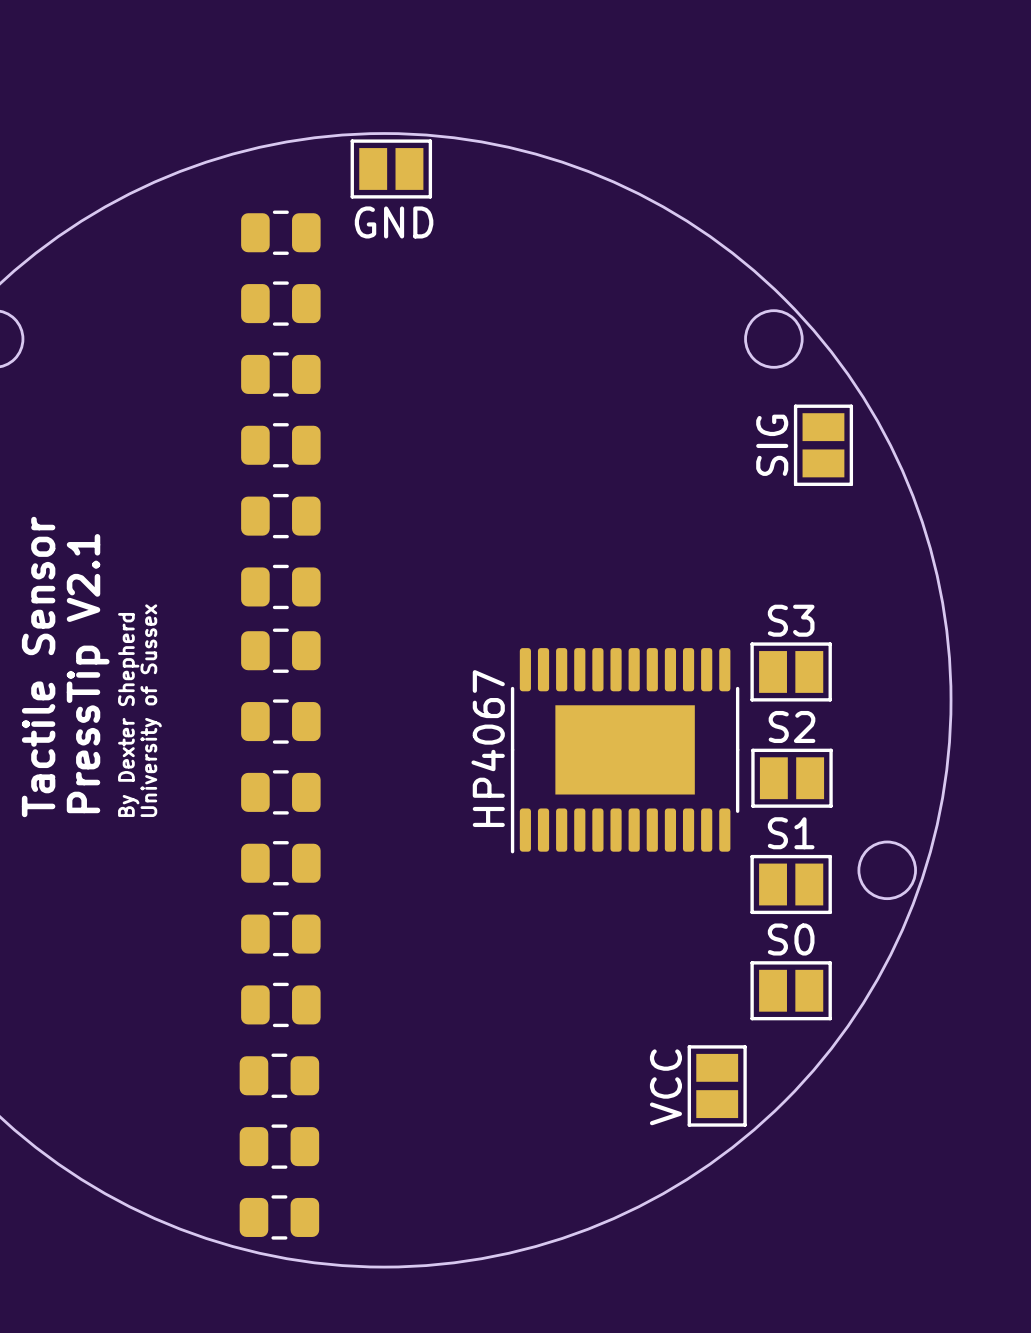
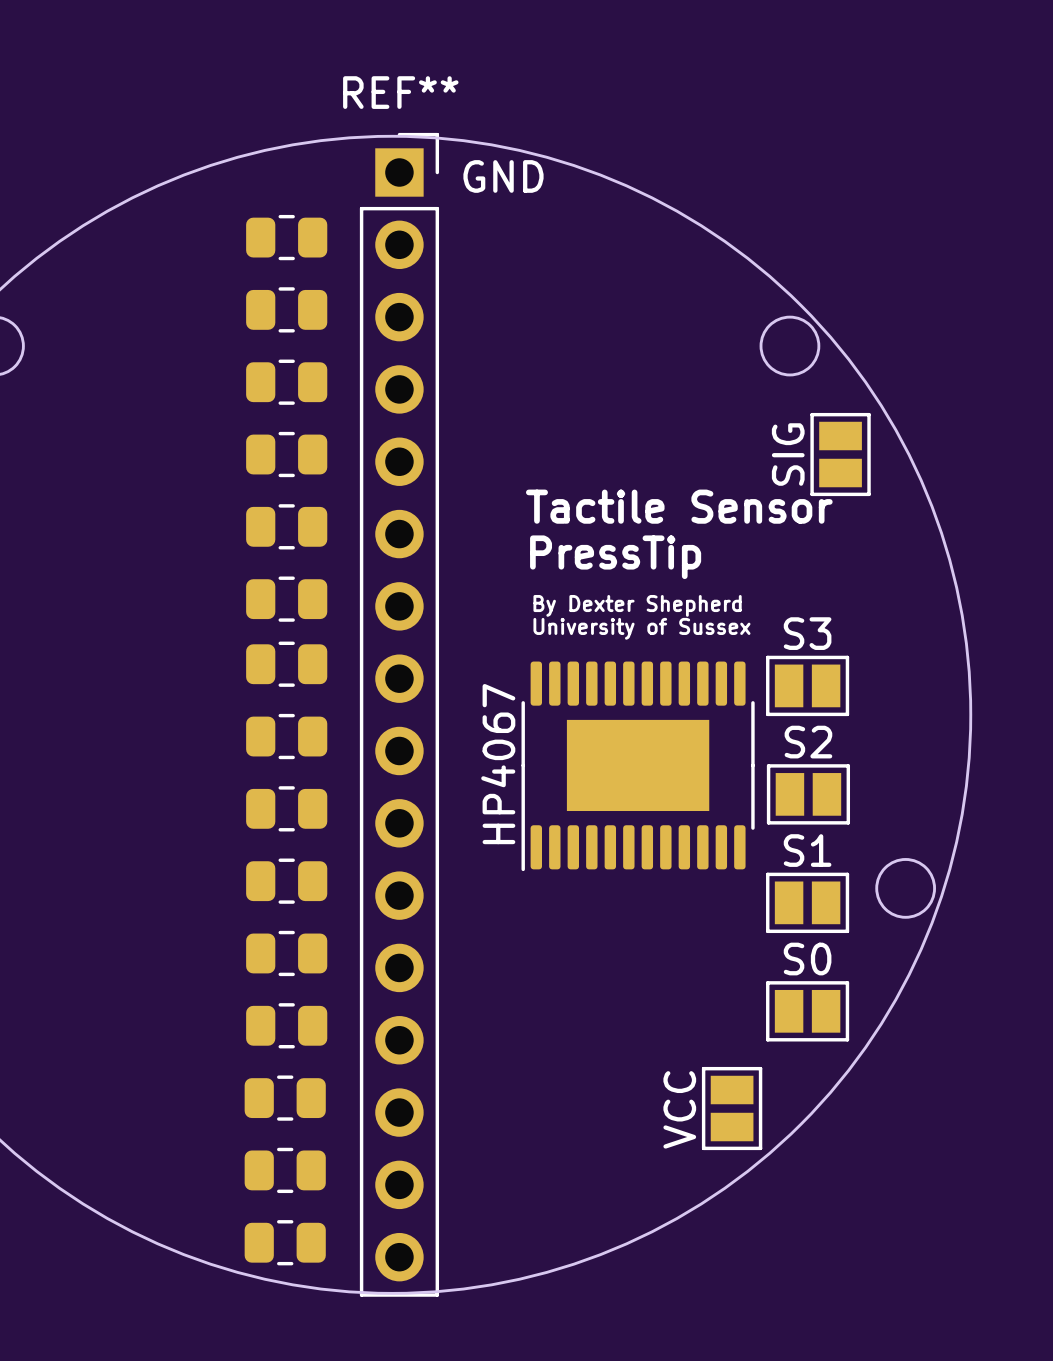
part: (391, 168) -> none
text position: GND (394, 222) -> GND (503, 176)
text: none -> PressTip (615, 557)
text rotation: 0° (38, 666) -> 90° clockwise (679, 506)
text position: Tactile Sensor (38, 666) -> Tactile Sensor (679, 506)
text: PressTip V2.1 (88, 673) -> none
REF**: none -> (399, 714)
text rotation: 0° (151, 710) -> 90° clockwise (641, 628)
text position: University of Sussex (151, 710) -> University of Sussex (641, 628)
text rotation: 0° (128, 714) -> 90° clockwise (637, 605)
text position: By Dexter Shepherd (128, 714) -> By Dexter Shepherd (637, 605)

